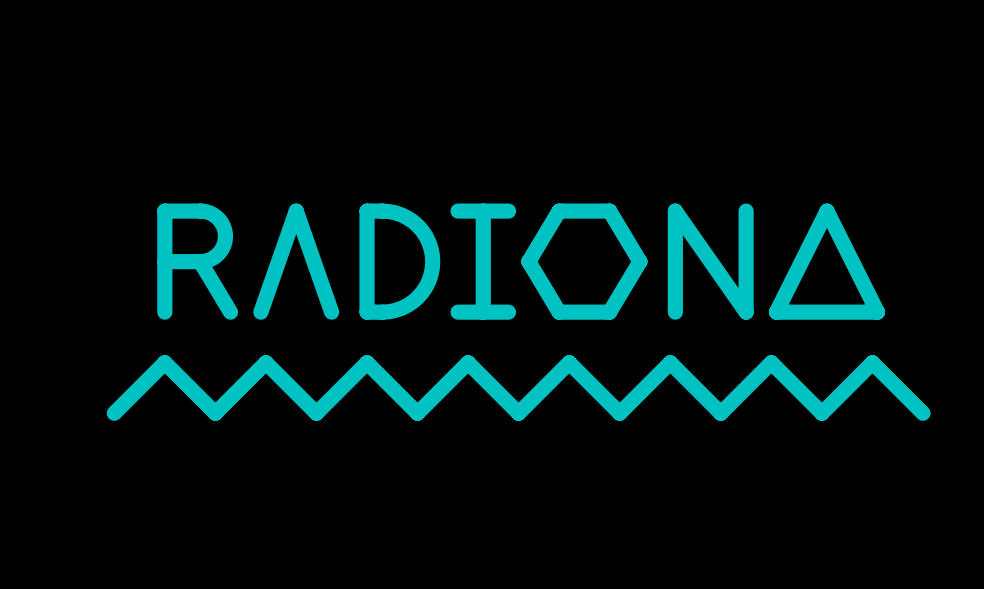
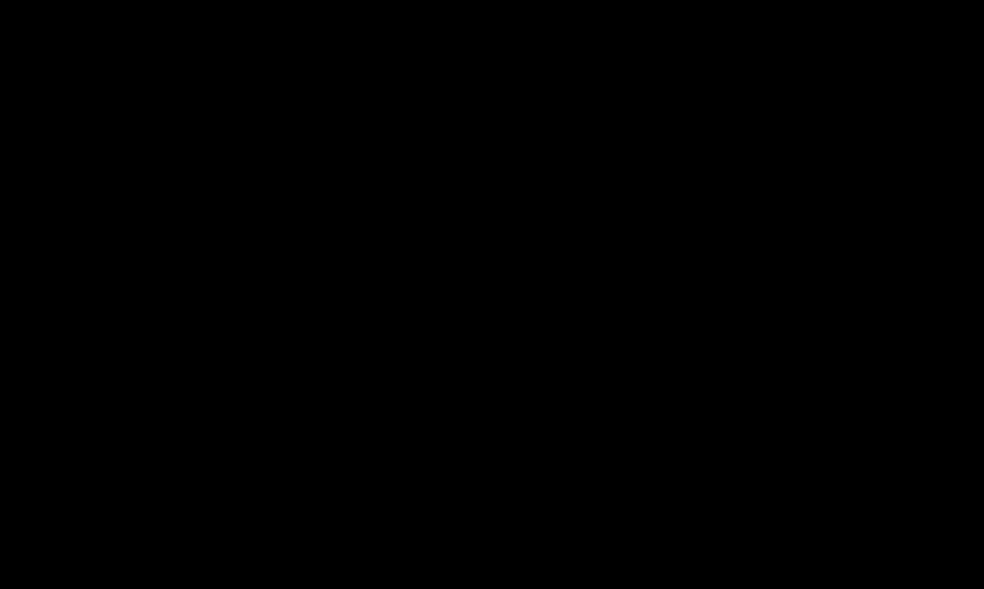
drawing: [106, 203, 931, 421] -> none

